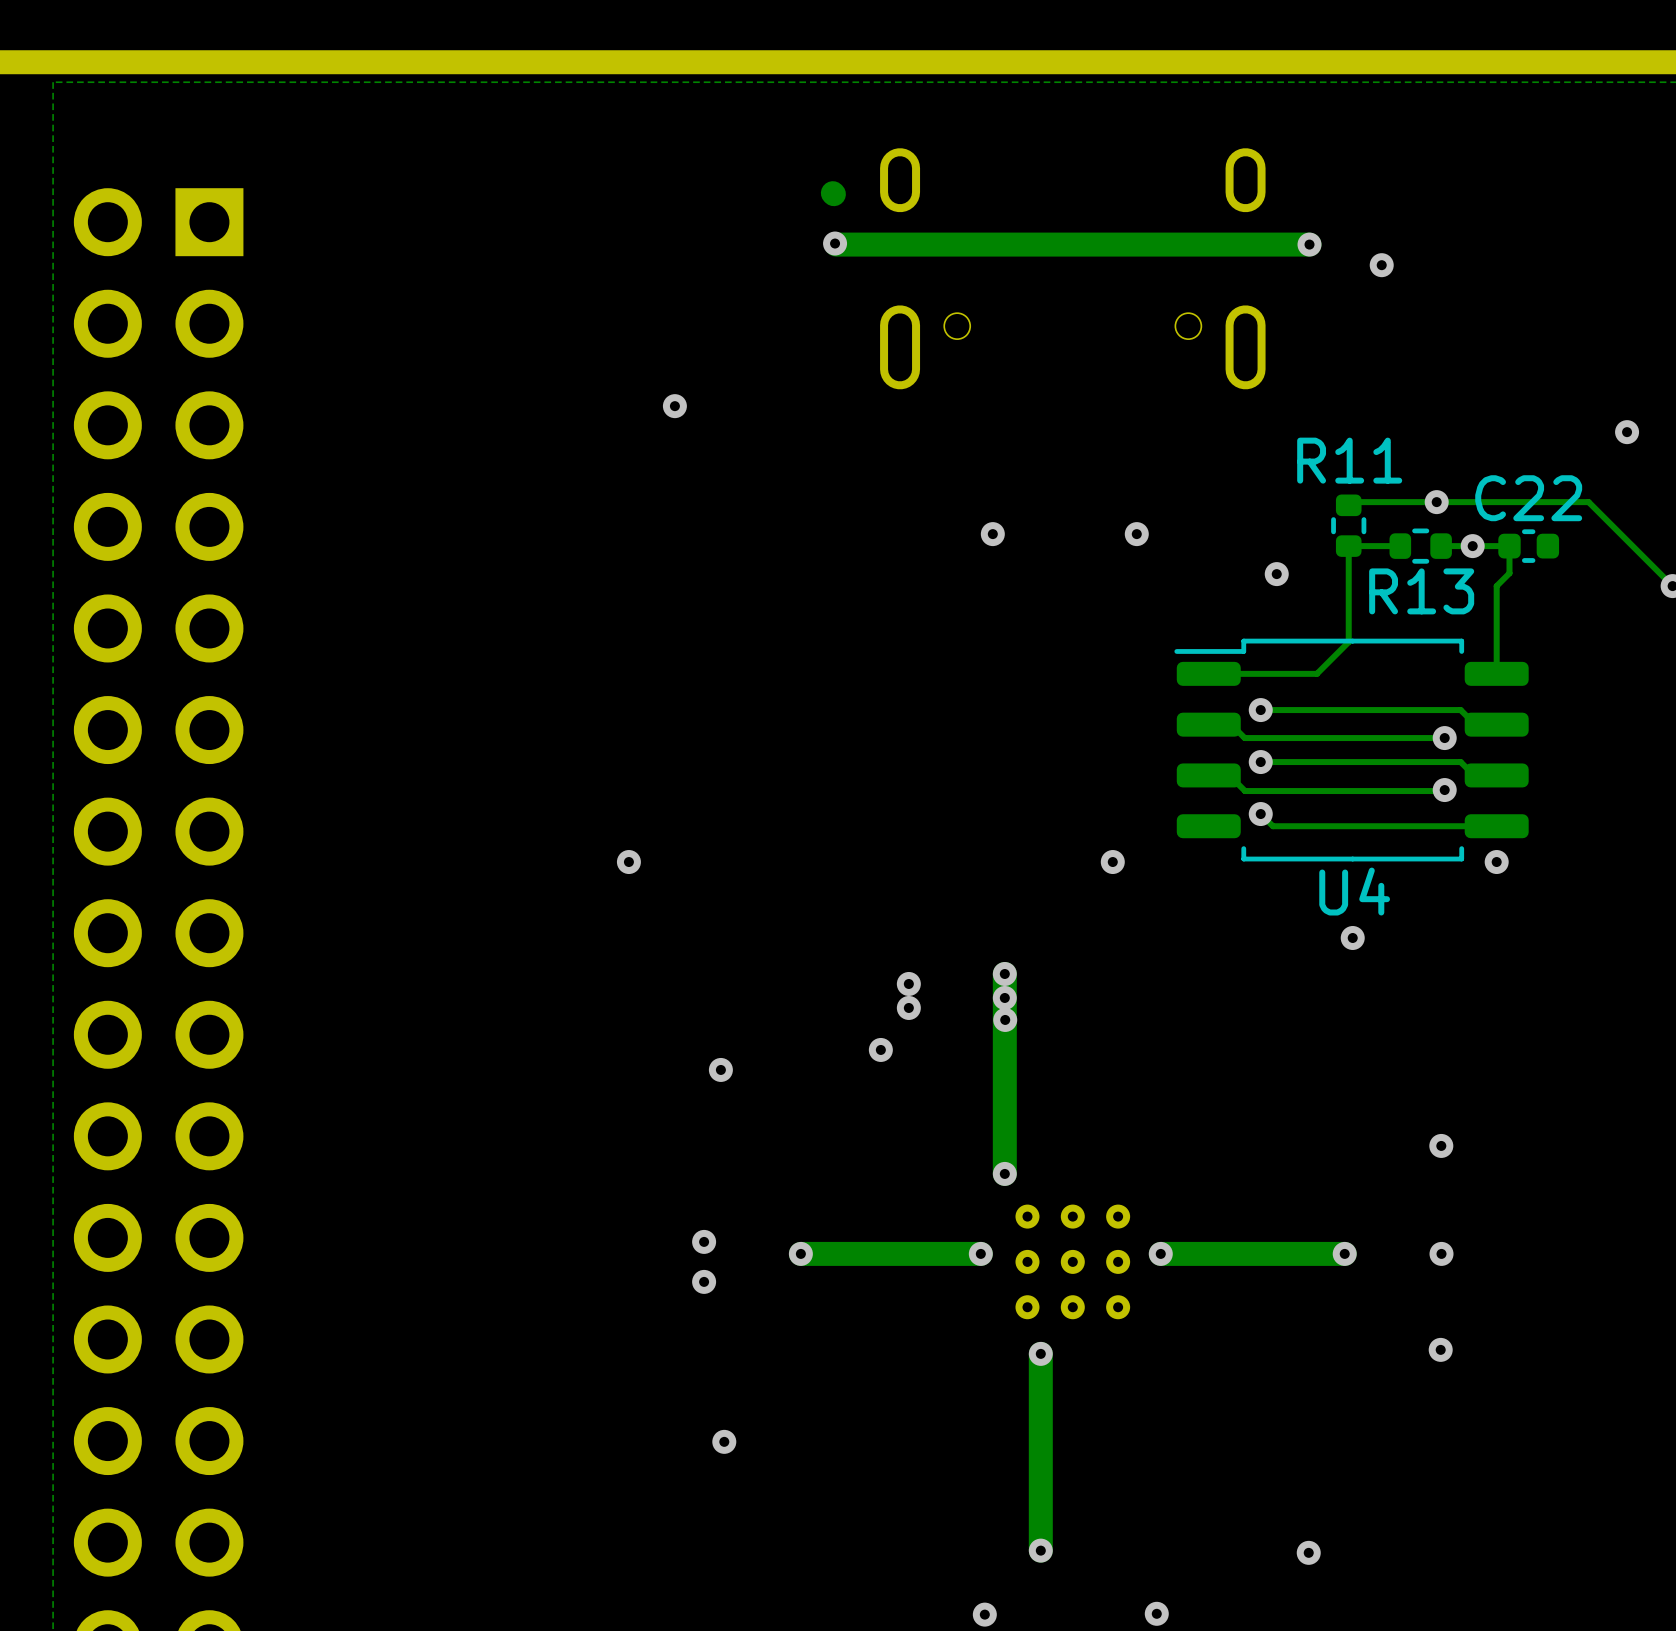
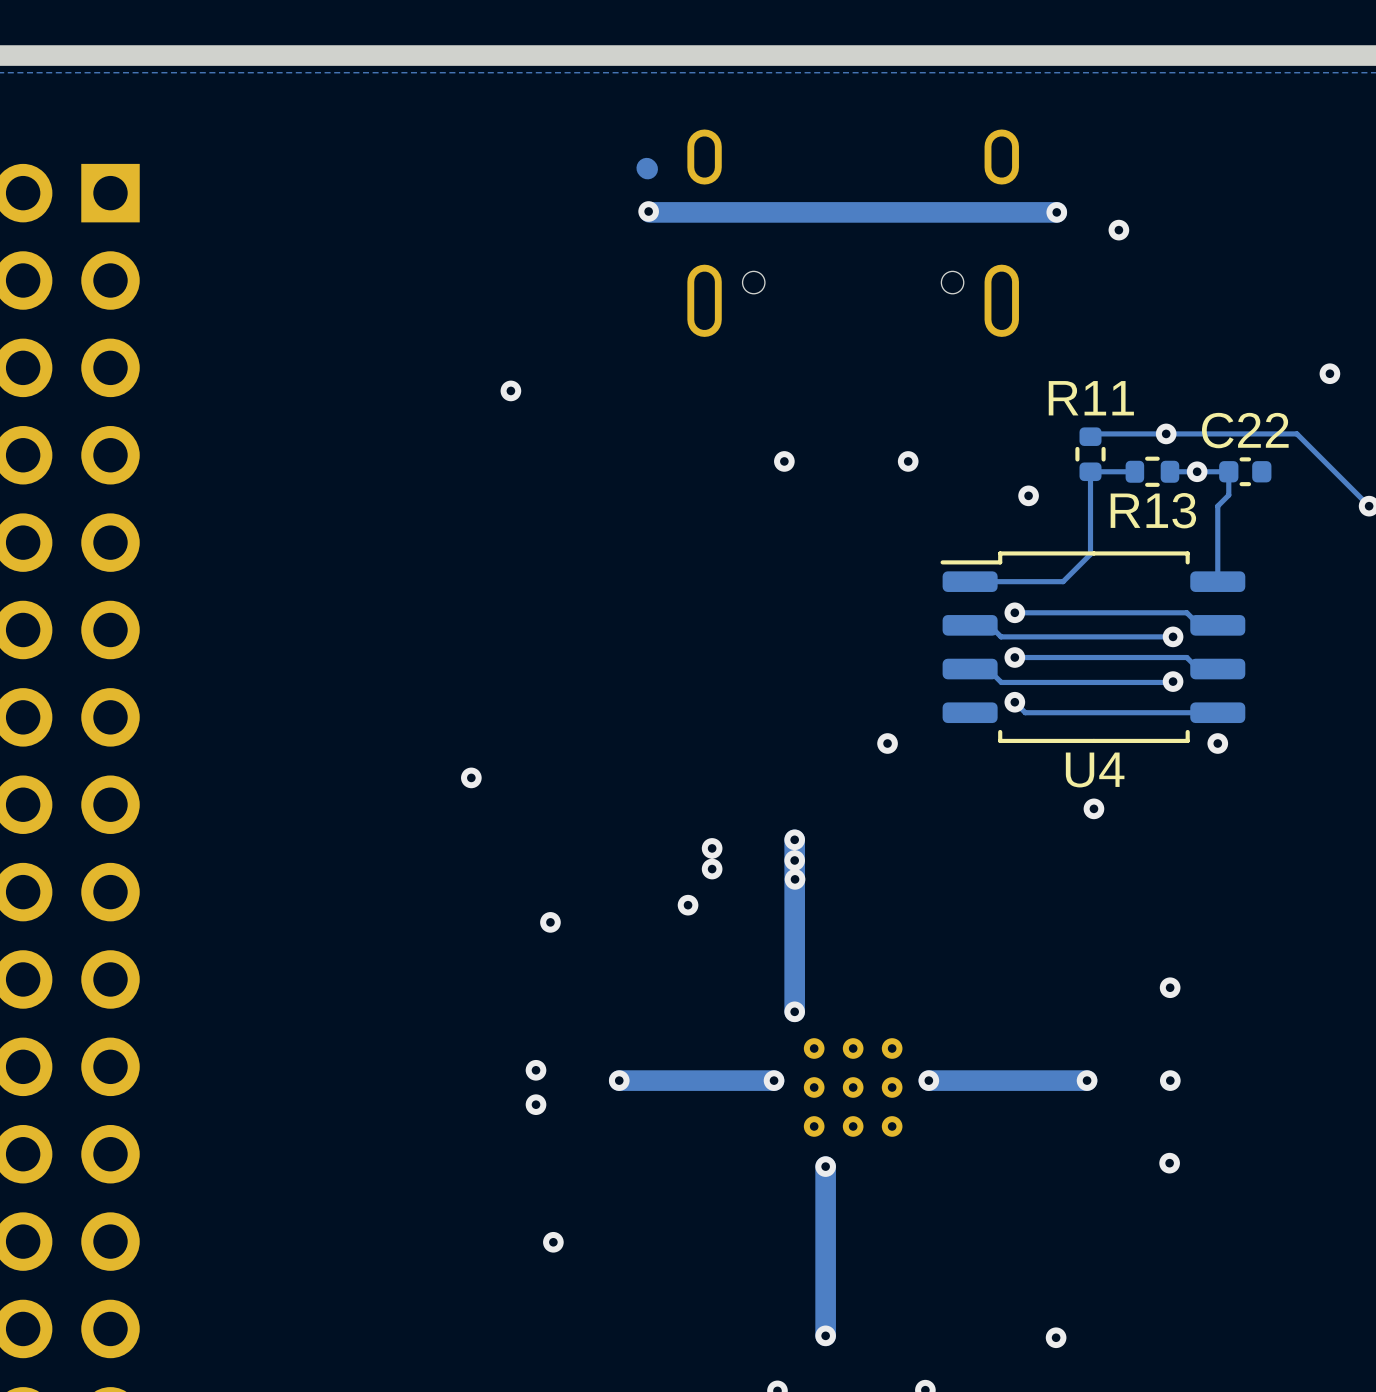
via position: (674, 406) -> (510, 390)
via position: (628, 862) -> (471, 777)

